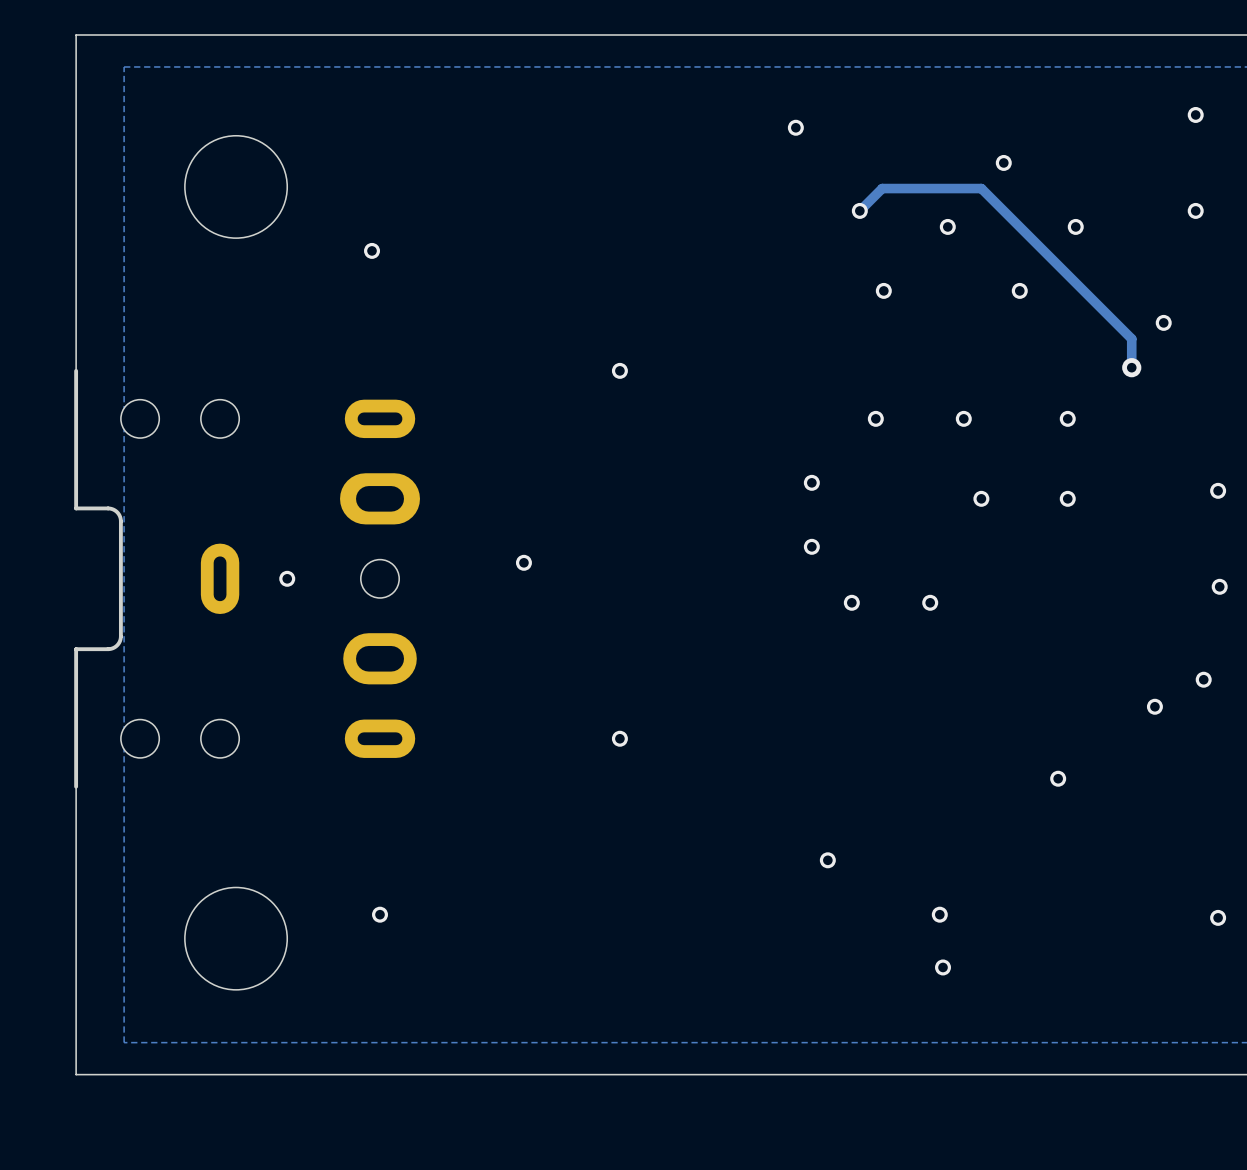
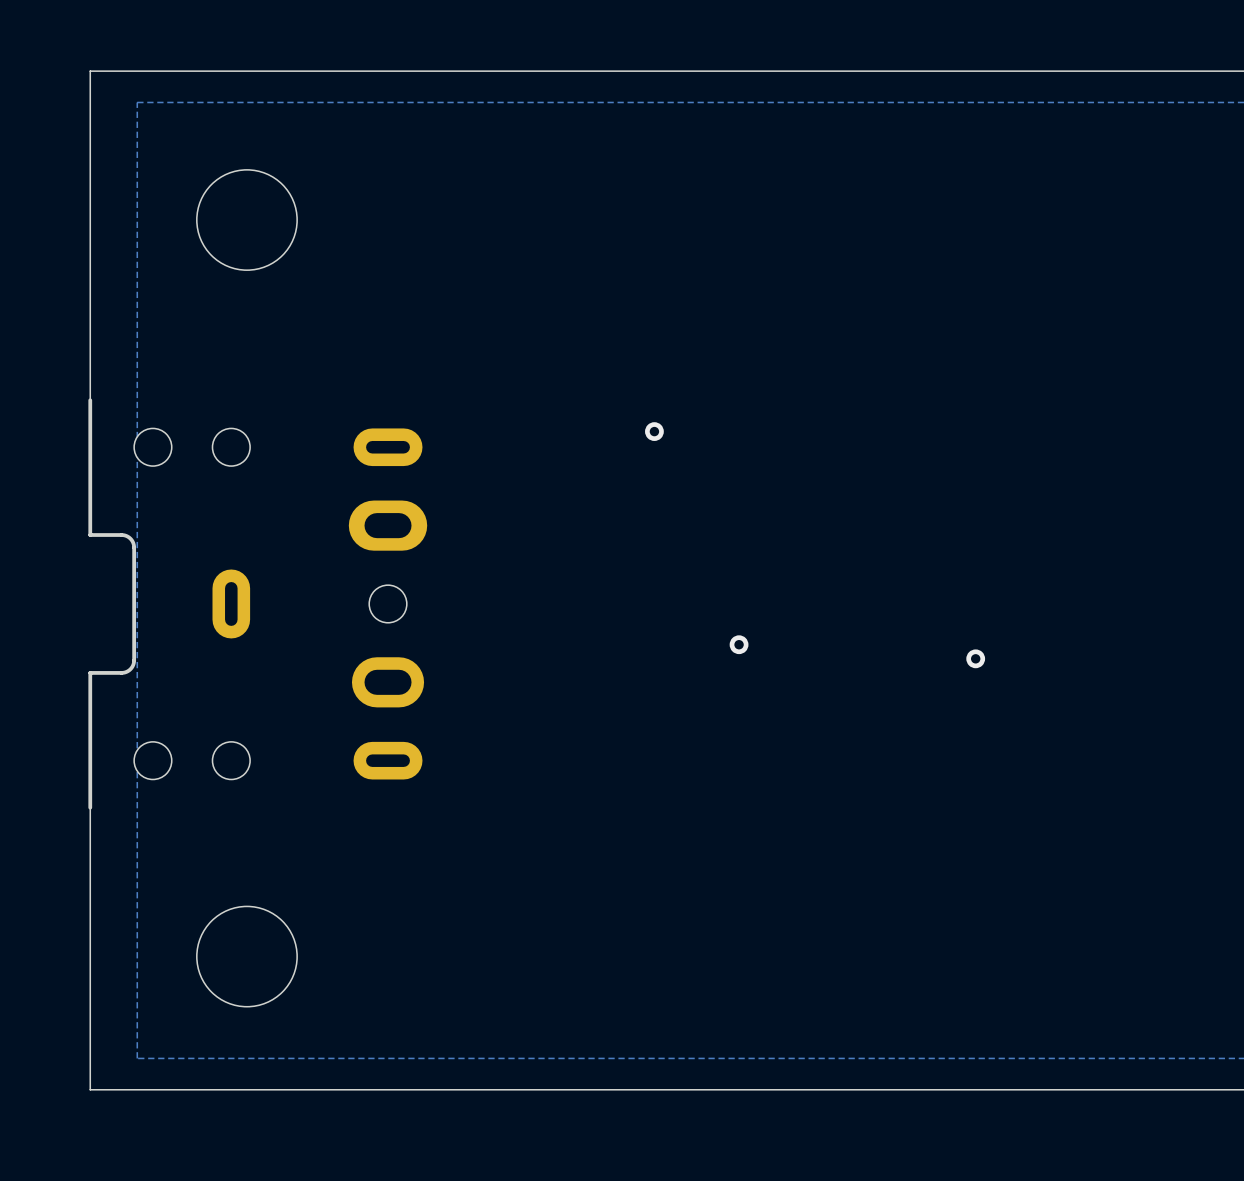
via: (1195, 114) -> none
via: (795, 127) -> none
via: (1003, 162) -> none
track: (859, 210) (882, 188) (981, 188) (1131, 338) (1131, 367) -> none
via: (859, 210) -> none
via: (1195, 210) -> none
via: (947, 226) -> none
via: (1075, 226) -> none
via: (372, 250) -> none
via: (883, 290) -> none
via: (1019, 290) -> none
via: (1163, 322) -> none
via: (1131, 367) -> none
via: (619, 370) -> none
via: none -> (654, 431)
via: (875, 418) -> none
via: (963, 418) -> none
via: (1067, 418) -> none
via: (811, 482) -> none
via: (1218, 490) -> none
via: (981, 498) -> none
via: (1067, 498) -> none
via: (811, 546) -> none
via: (523, 562) -> none
via: (287, 578) -> none
via: (1219, 586) -> none
via: (851, 602) -> none
via: (930, 602) -> none
via: none -> (739, 644)
via: none -> (975, 658)
via: (1203, 679) -> none
via: (1154, 706) -> none
via: (619, 738) -> none
via: (1058, 778) -> none
via: (827, 860) -> none
via: (380, 914) -> none
via: (939, 914) -> none
via: (1218, 917) -> none
via: (943, 967) -> none

